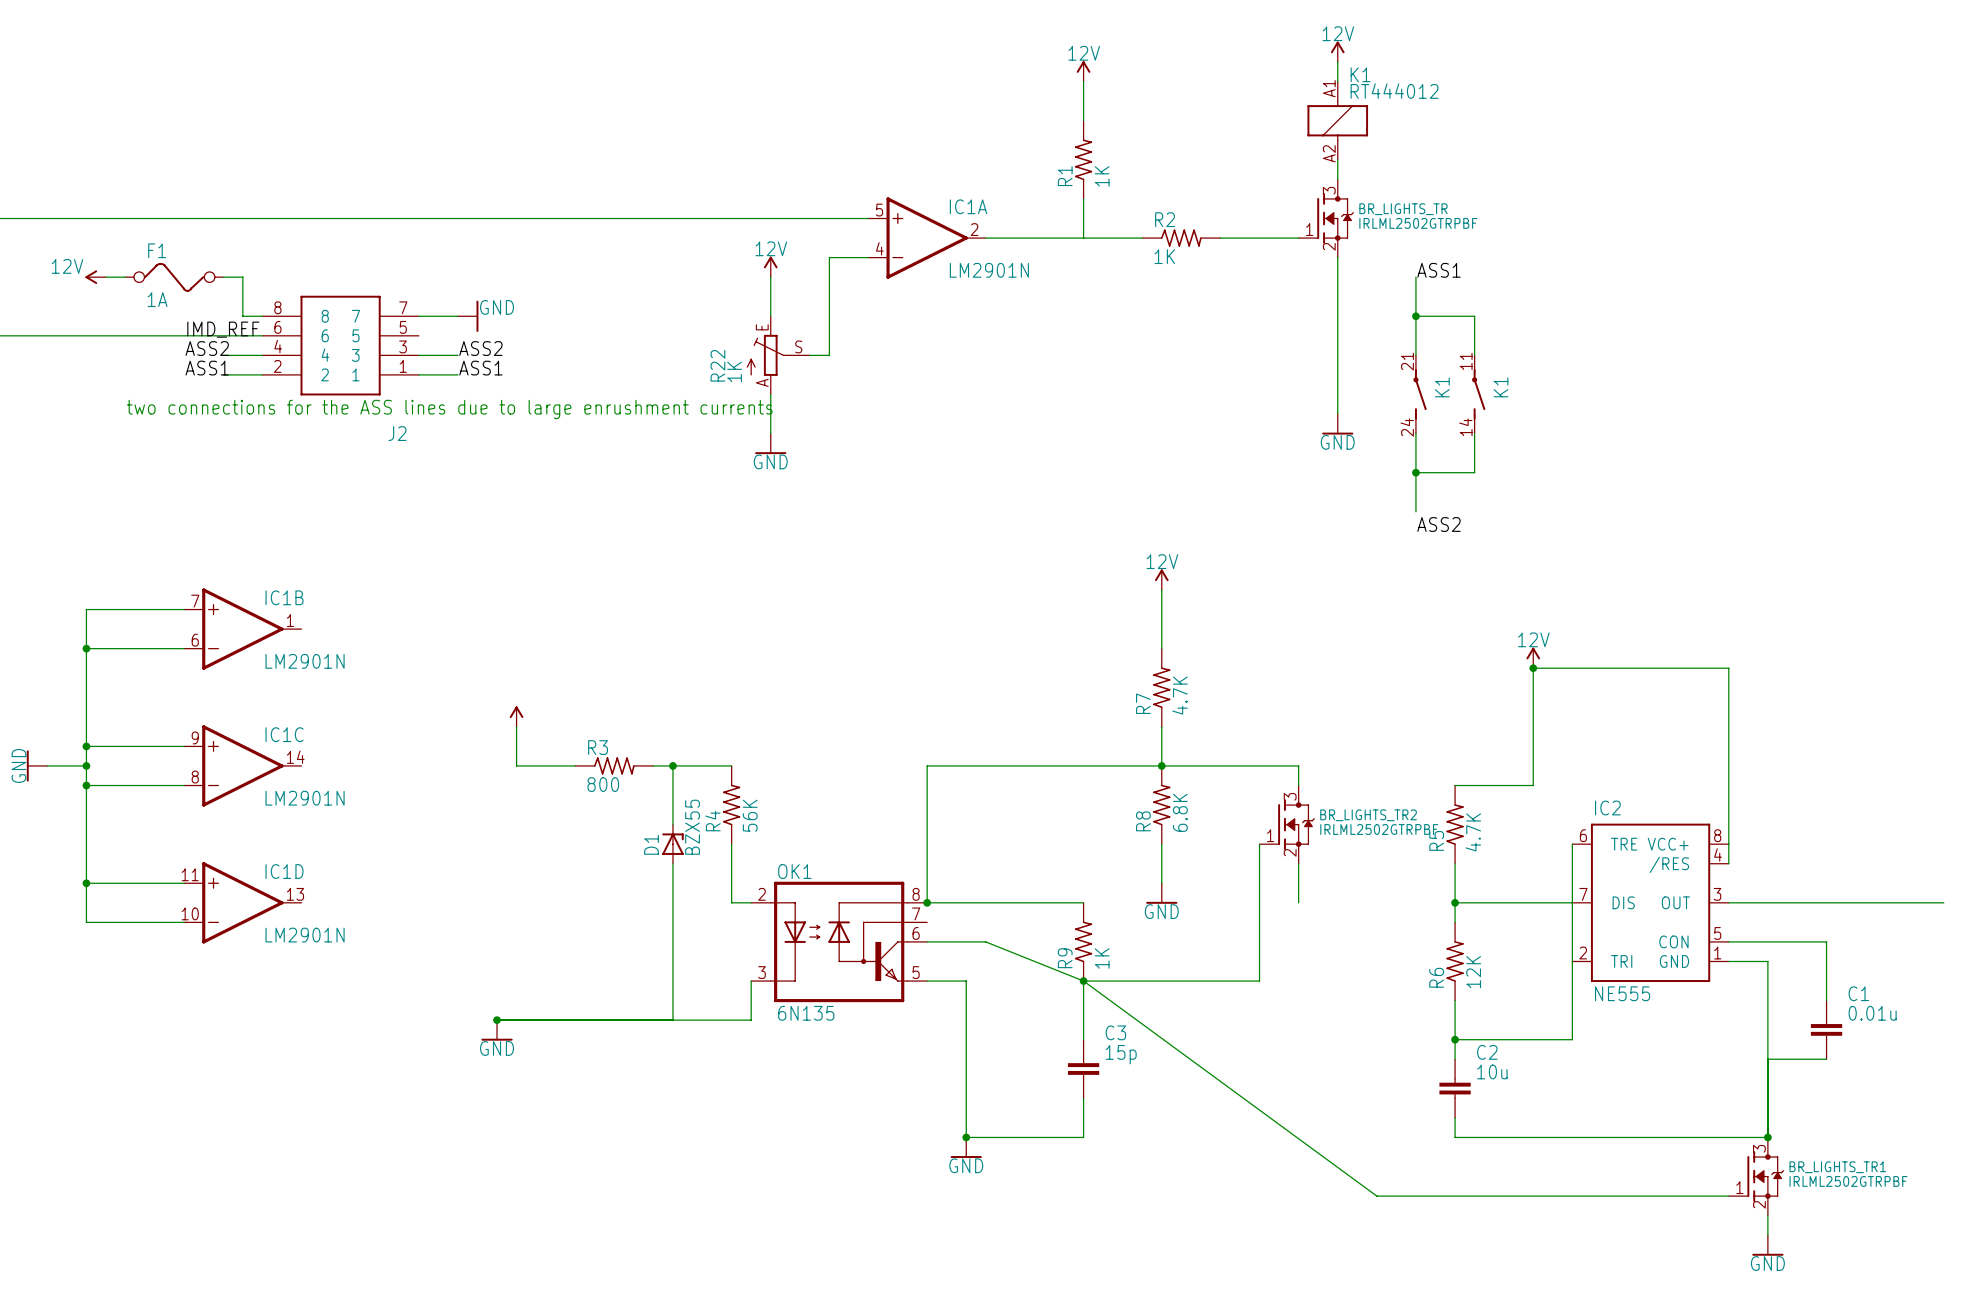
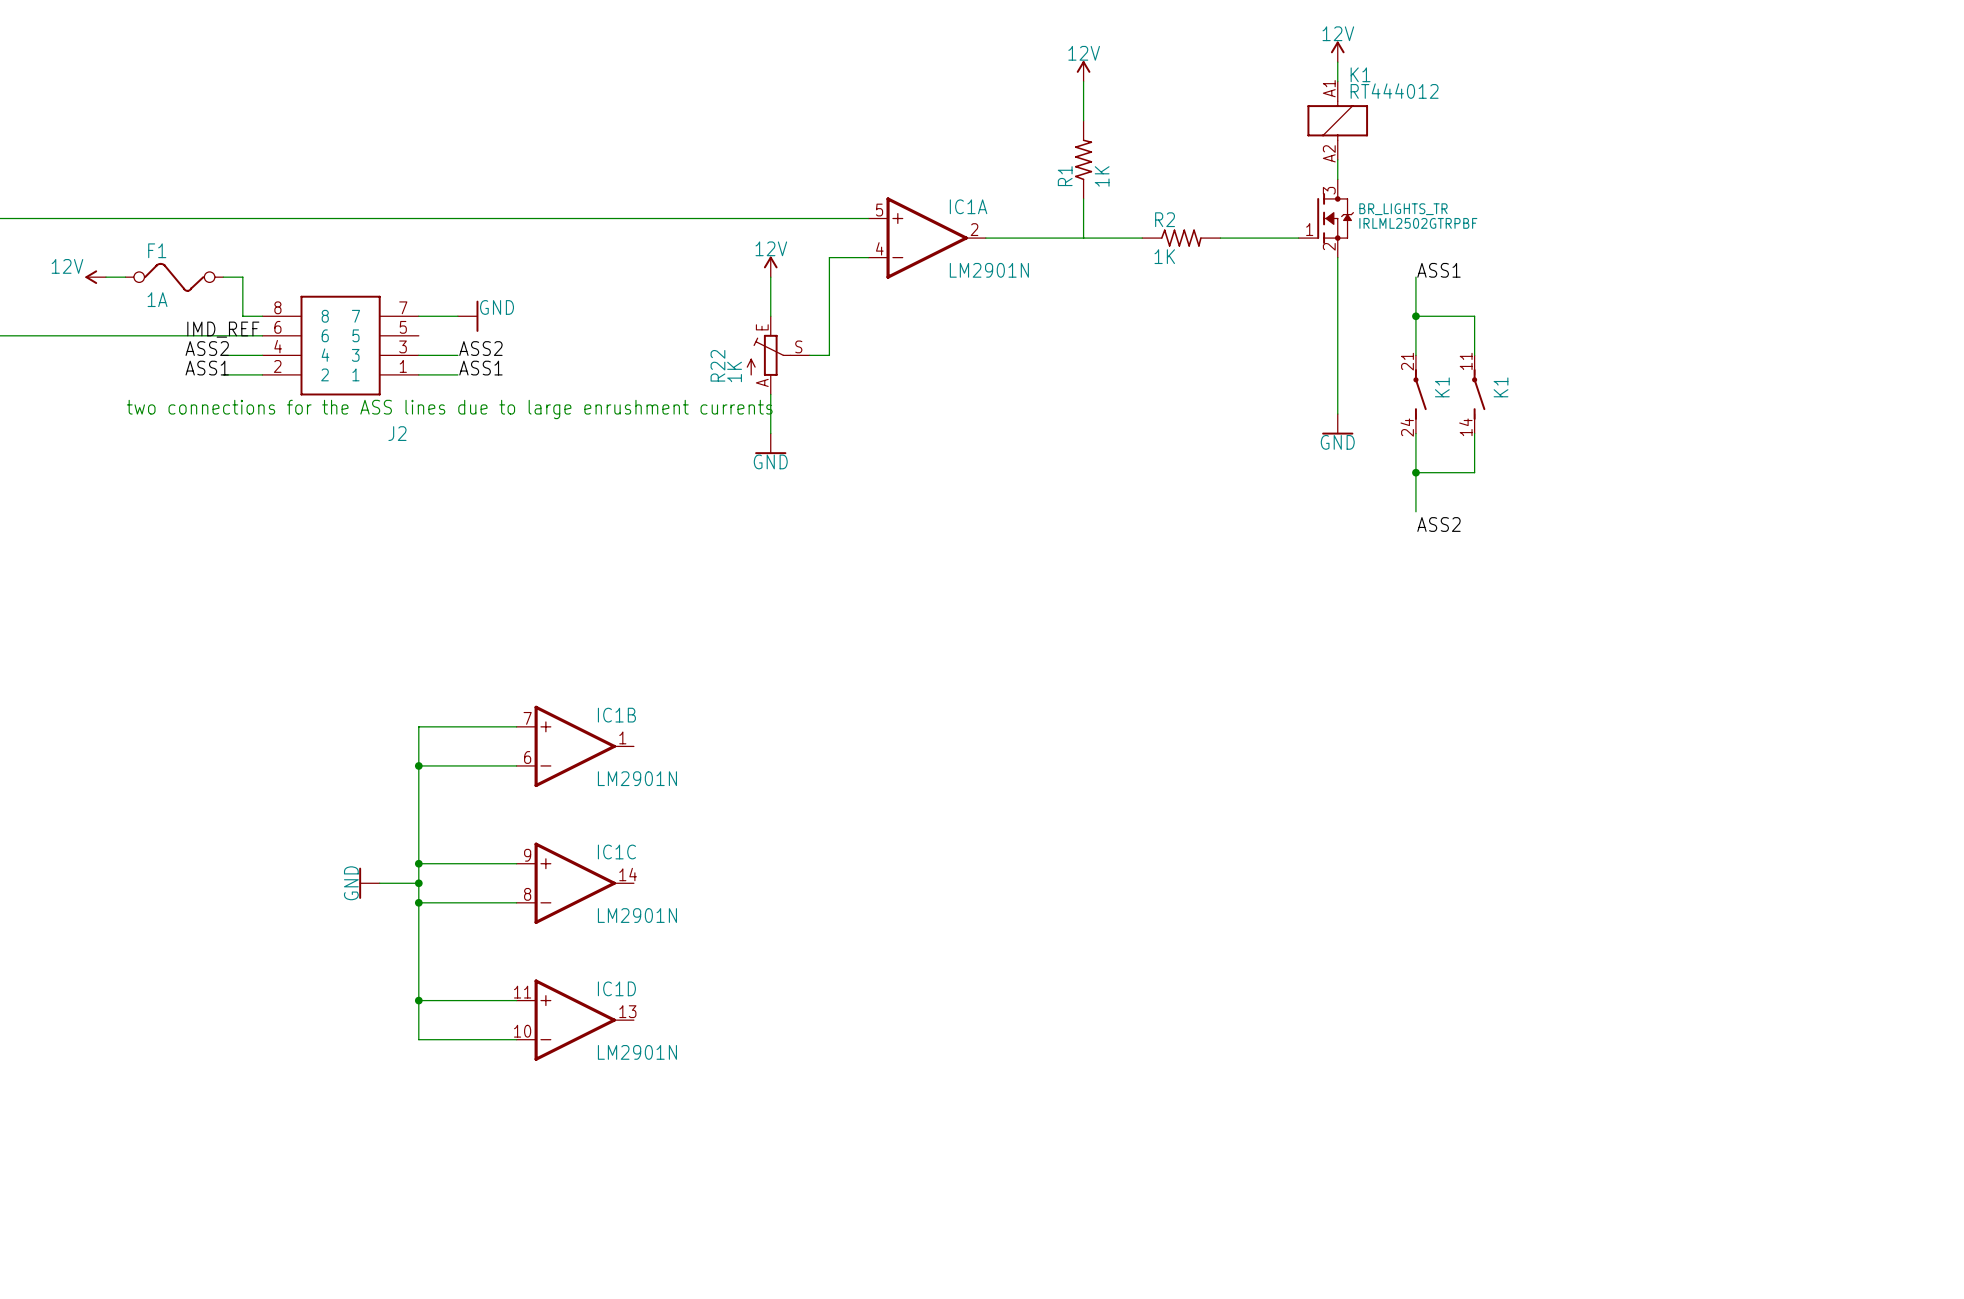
power symbol: 12V (1161, 579) -> none
wire: (1161, 589) (1161, 648) -> none
wire: (184, 609) (86, 609) (86, 922) (184, 922) -> none
IC1B position: (242, 629) -> (575, 746)
wire: (86, 648) (184, 648) -> none
junction: (86, 648) -> none
power symbol: 12V (1533, 657) -> none
junction: (1533, 668) -> none
R7: 4.7K (1161, 687) -> none
power symbol: (516, 716) -> none
wire: (516, 726) (516, 765) (575, 765) -> (516, 726) (418, 726) (418, 1039) (516, 1039)
wire: (1161, 726) (1161, 765) -> none
wire: (86, 746) (184, 746) -> none
junction: (86, 746) -> none
power symbol: GND (37, 765) -> none
wire: (47, 765) (86, 765) -> none
junction: (86, 765) -> none
IC1C position: (242, 765) -> (575, 883)
wire: none -> (418, 765) (516, 765)
junction: none -> (418, 765)
R3: 800 (614, 765) -> none
wire: (653, 765) (731, 765) -> none
wire: (672, 765) (672, 824) -> none
junction: (672, 765) -> none
junction: (1161, 765) -> none
wire: (86, 785) (184, 785) -> none
junction: (86, 785) -> none
wire: (1298, 785) (1298, 765) (927, 765) (927, 902) (1083, 902) -> none
wire: (1455, 785) (1533, 785) (1533, 668) (1728, 668) (1728, 863) -> none
R4: 56K (731, 805) -> none
R8: 6.8K (1161, 805) -> none
BR_LIGHTS_TR2: IRLML2502GTRPBF (1287, 824) -> none
R5: 4.7K (1455, 824) -> none
D1: BZX55 (672, 844) -> none
wire: (731, 844) (731, 902) (751, 902) -> none
wire: (1161, 844) (1161, 883) -> none
wire: (1259, 844) (1259, 981) (1083, 981) -> none
wire: (1572, 844) (1572, 1039) (1455, 1039) -> none
wire: none -> (418, 863) (516, 863)
junction: none -> (418, 863)
wire: (672, 863) (672, 1020) -> none
wire: (1298, 863) (1298, 902) -> none
wire: (1455, 863) (1455, 922) -> none
wire: (86, 883) (184, 883) -> none
junction: (86, 883) -> none
power symbol: none -> GND (369, 883)
wire: none -> (379, 883) (418, 883)
junction: none -> (418, 883)
power symbol: GND (1161, 893) -> none
IC1D position: (242, 902) -> (575, 1020)
wire: none -> (418, 902) (516, 902)
junction: none -> (418, 902)
junction: (927, 902) -> none
wire: (1455, 902) (1572, 902) -> none
junction: (1455, 902) -> none
IC2: NE555 (1650, 902) -> none
wire: (1728, 902) (1943, 902) -> none
OK1: 6N135 (839, 941) -> none
wire: (927, 941) (985, 941) (1083, 981) -> none
R9: 1K (1083, 941) -> none
wire: (1728, 941) (1826, 941) (1826, 1000) -> none
R6: 12K (1455, 961) -> none
wire: (1728, 961) (1767, 961) (1767, 1137) (1455, 1137) (1455, 1117) -> none
wire: (751, 981) (751, 1020) (497, 1020) -> none
wire: (927, 981) (966, 981) (966, 1137) (1083, 1137) (1083, 1098) -> none
wire: (1083, 981) (1083, 1039) -> none
wire: (1083, 981) (1376, 1196) (1728, 1196) -> none
junction: (1083, 981) -> none
wire: none -> (418, 1000) (516, 1000)
junction: none -> (418, 1000)
wire: (1455, 1000) (1455, 1059) -> none
junction: (497, 1020) -> none
C1: 0.01u (1826, 1029) -> none
power symbol: GND (497, 1030) -> none
junction: (1455, 1039) -> none
wire: (1767, 1059) (1826, 1059) -> none
C3: 15p (1083, 1069) -> none
C2: 10u (1455, 1088) -> none
junction: (966, 1137) -> none
junction: (1767, 1137) -> none
power symbol: GND (966, 1147) -> none
BR_LIGHTS_TR1: IRLML2502GTRPBF (1756, 1176) -> none
wire: (1767, 1215) (1767, 1235) -> none
power symbol: GND (1767, 1245) -> none

